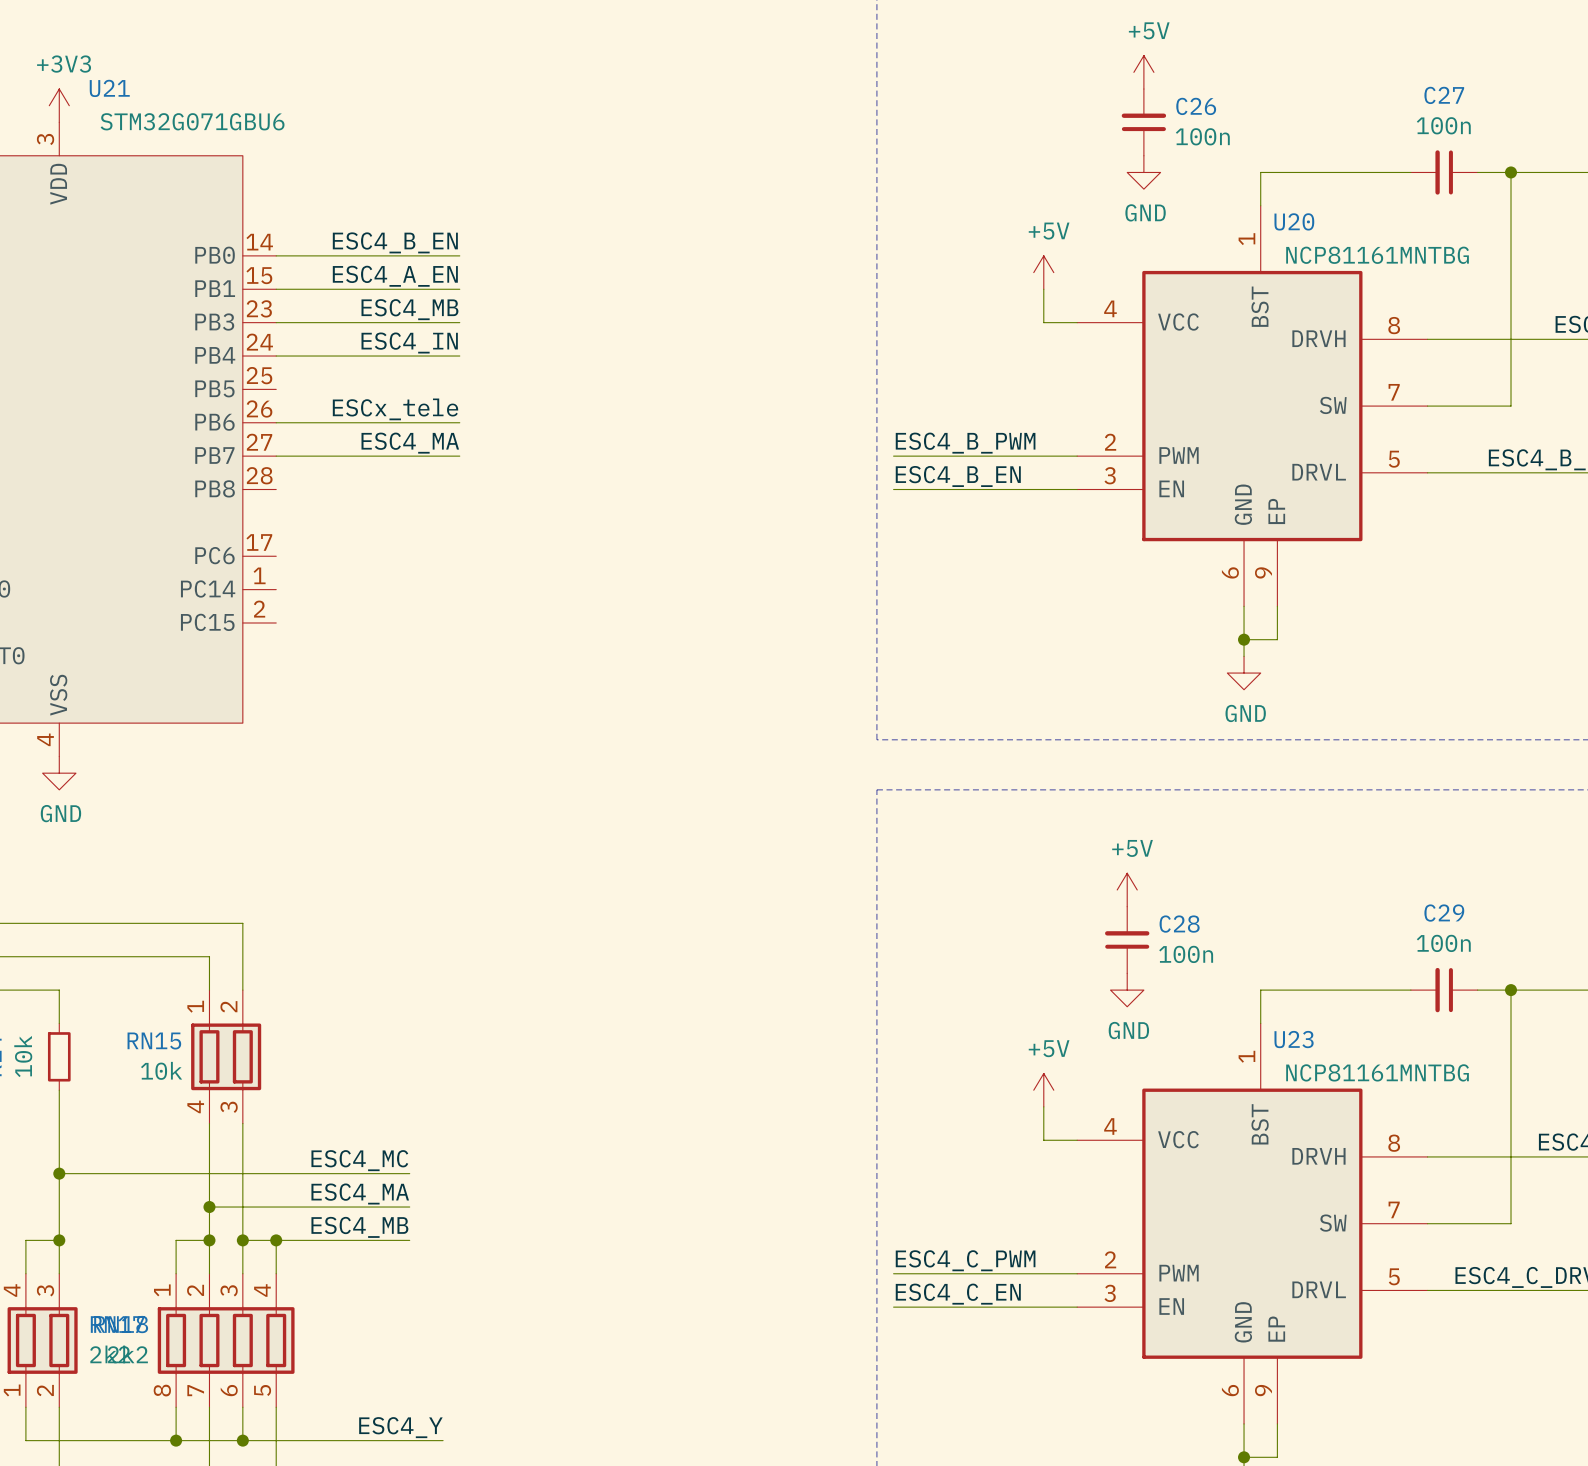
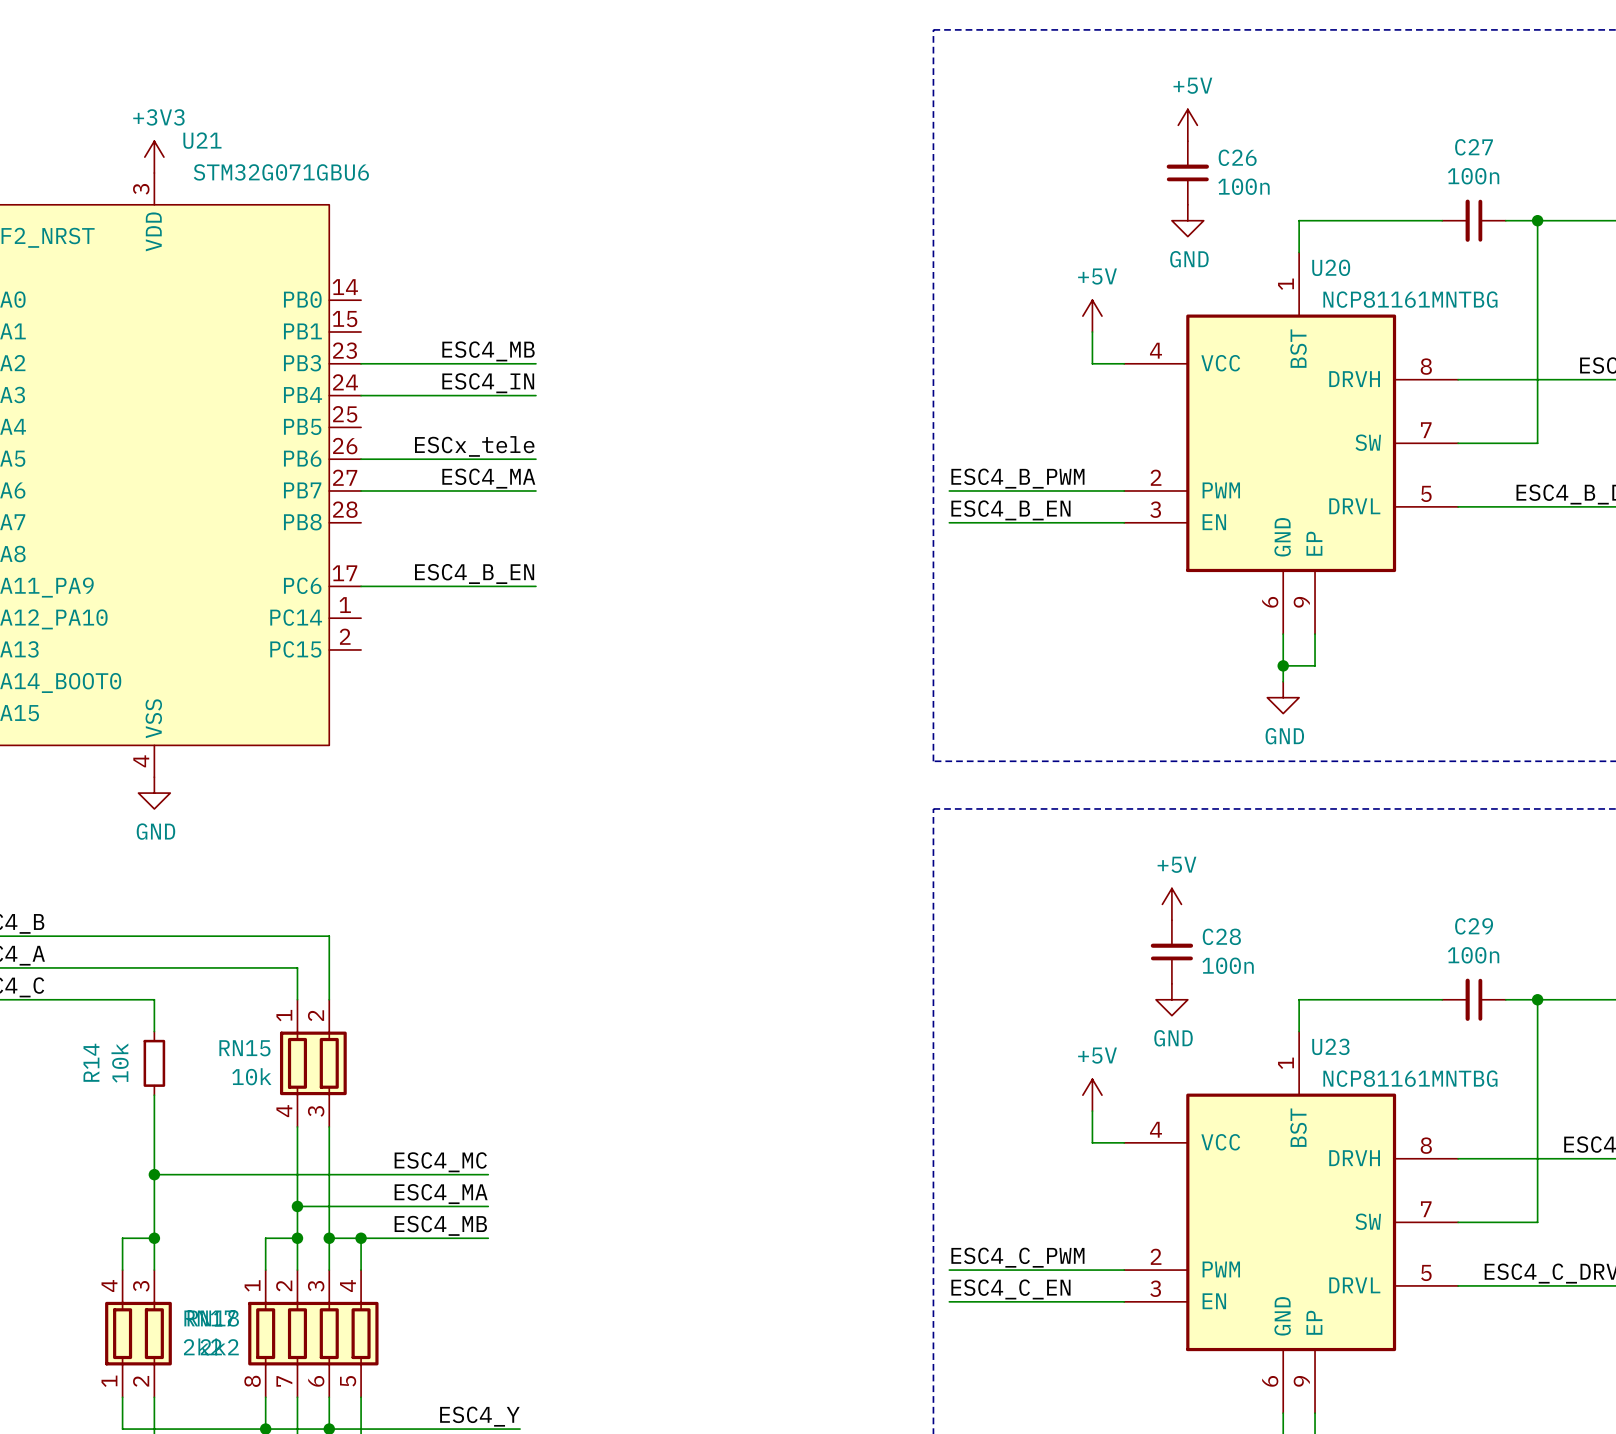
label position: ESC4_B_EN (395, 242) -> ESC4_B_EN (474, 573)
wire: (276, 255) (459, 255) -> none
label: ESC4_A_EN (395, 276) -> none
wire: (276, 289) (459, 289) -> (361, 586) (535, 586)

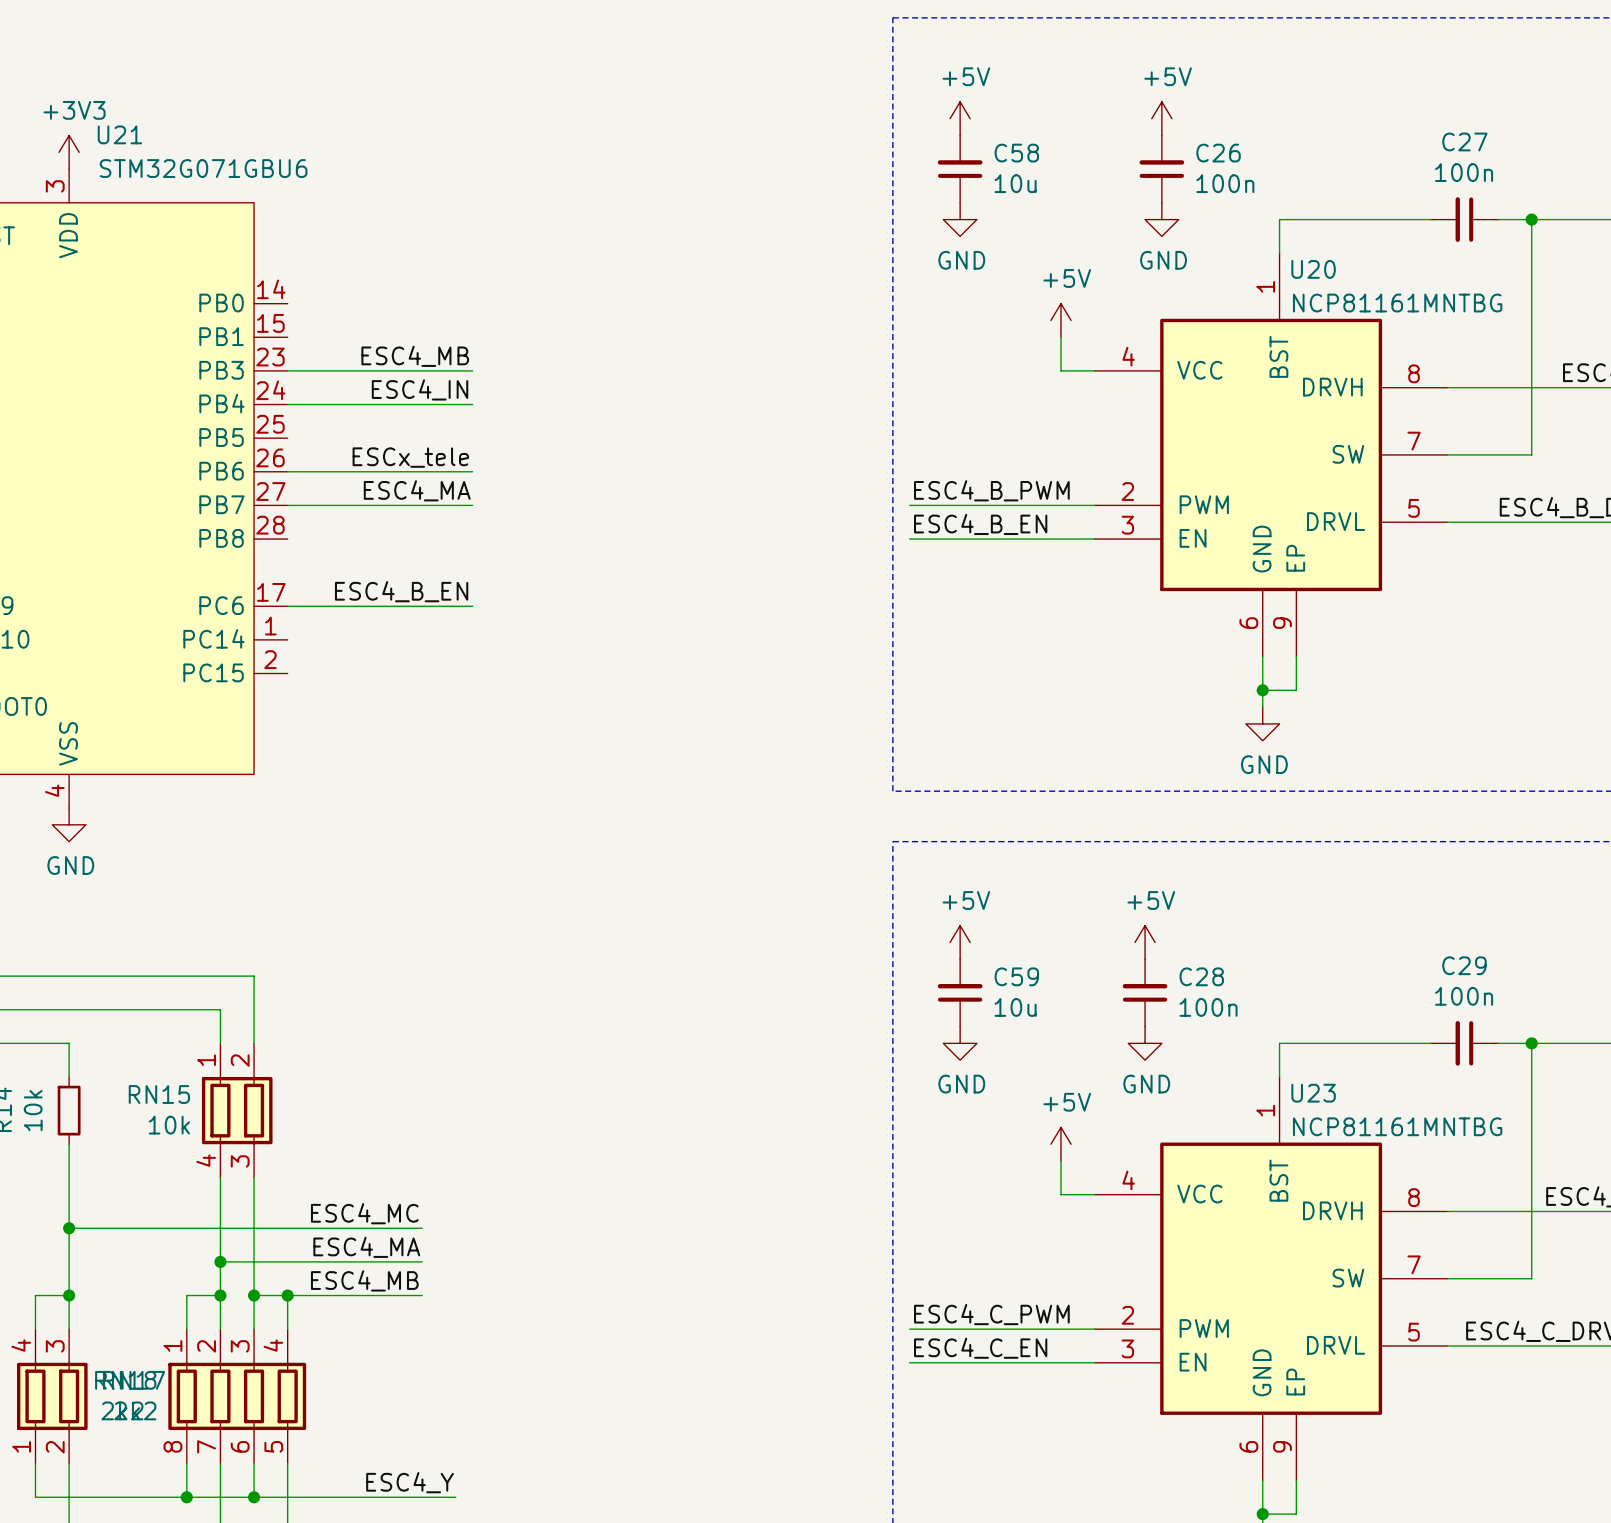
power symbol: none -> +5V (960, 118)
C58: none -> 10u (960, 169)
power symbol: none -> GND (960, 219)
power symbol: none -> +5V (960, 942)
C59: none -> 10u (960, 992)
power symbol: none -> GND (960, 1043)

